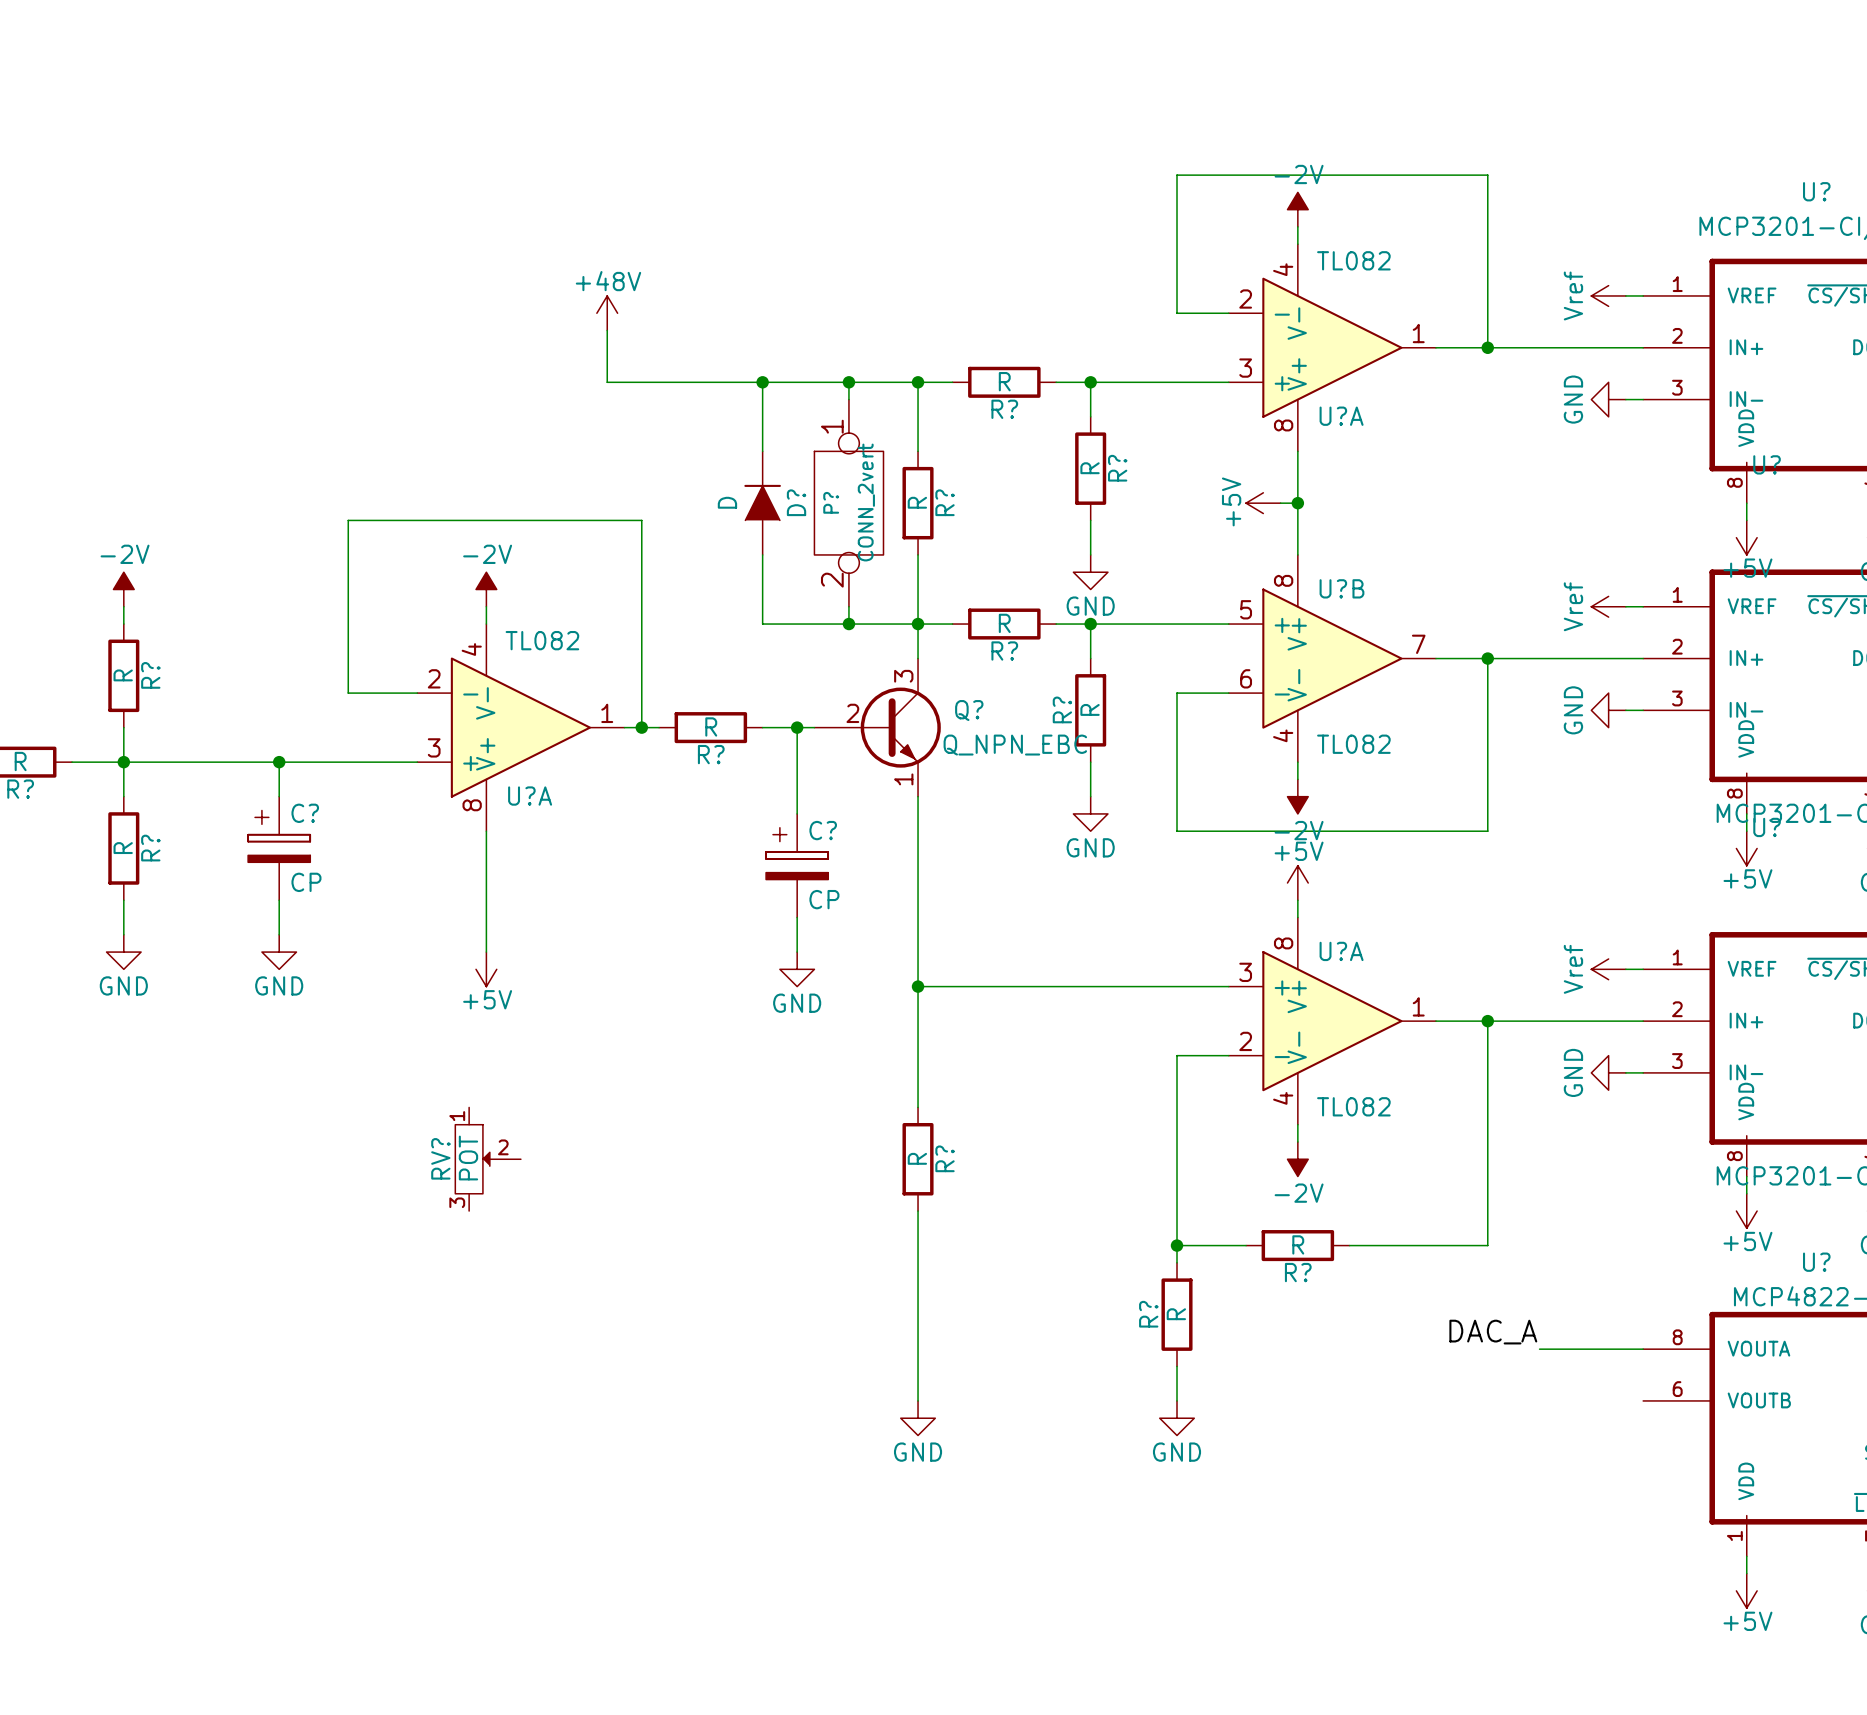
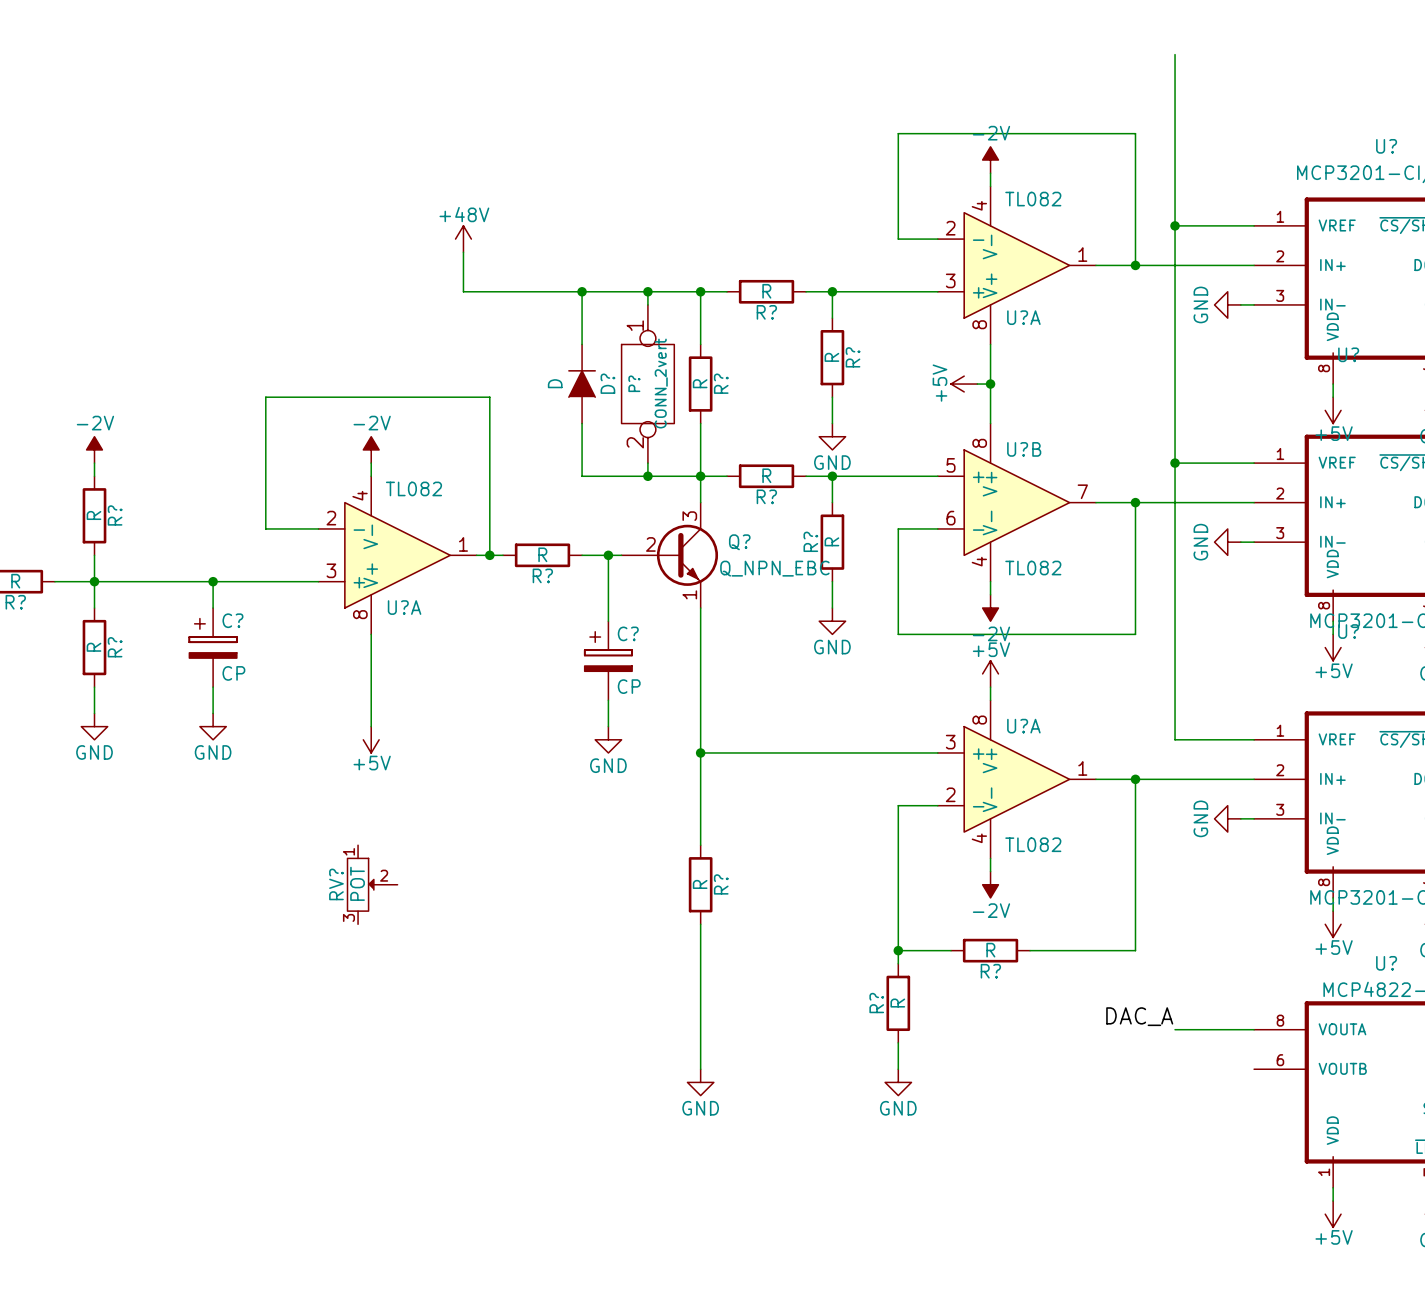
wire: none -> (1175, 54) (1175, 739) (1240, 739)
wire: none -> (1175, 225) (1240, 225)
junction: none -> (1175, 225)
power symbol: Vref (1608, 295) -> none
wire: none -> (1175, 463) (1240, 463)
junction: none -> (1175, 463)
power symbol: Vref (1608, 606) -> none
power symbol: Vref (1608, 969) -> none

